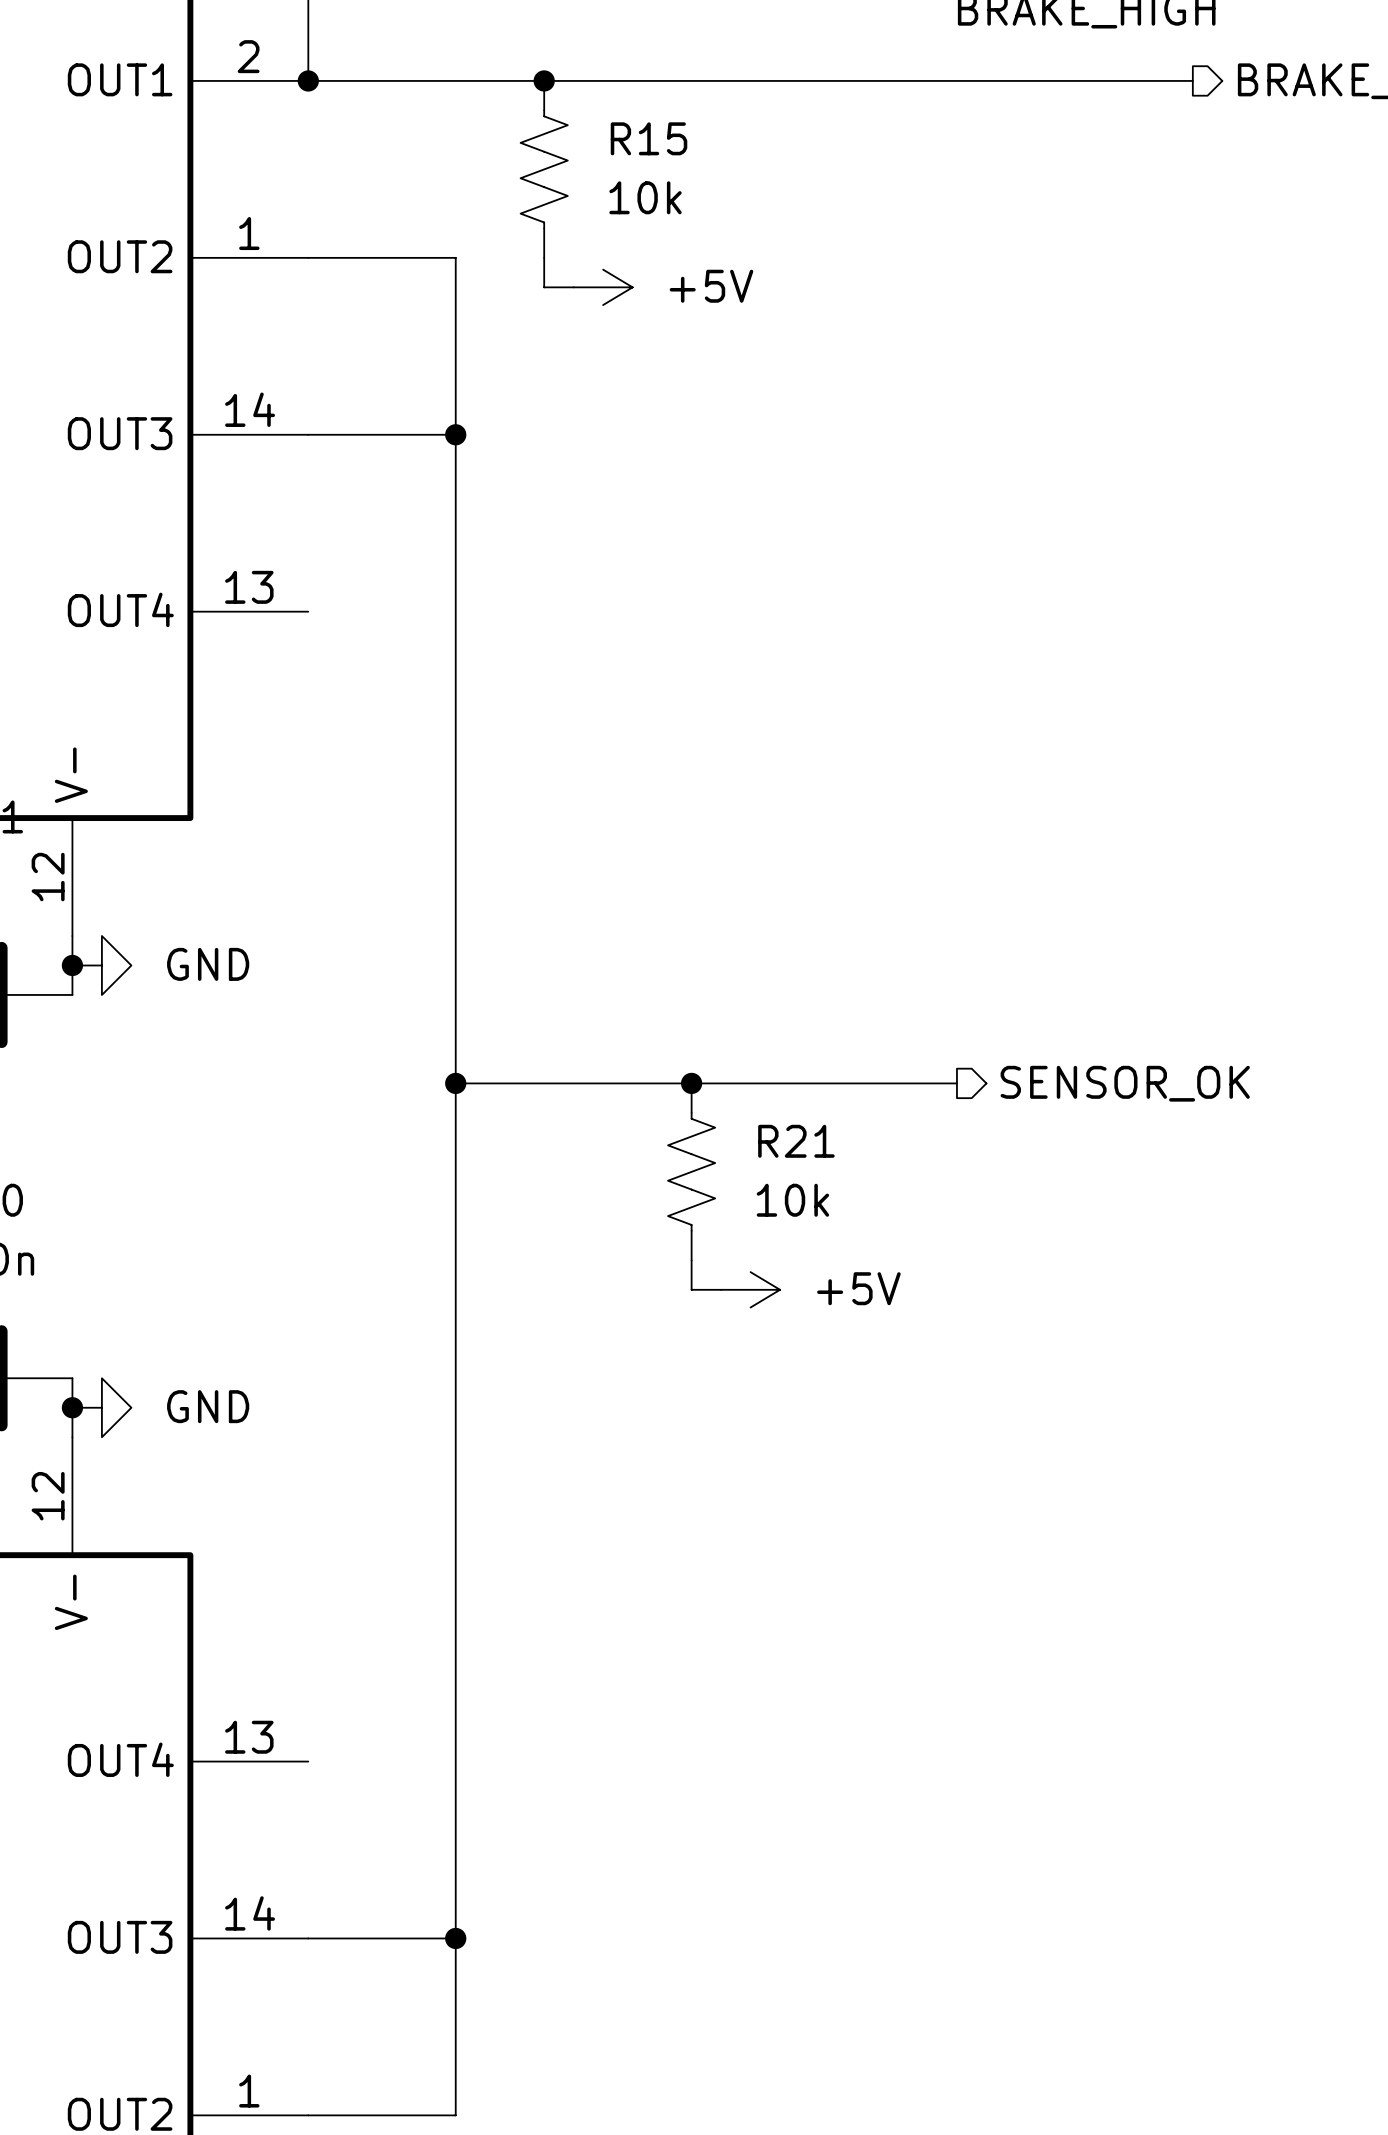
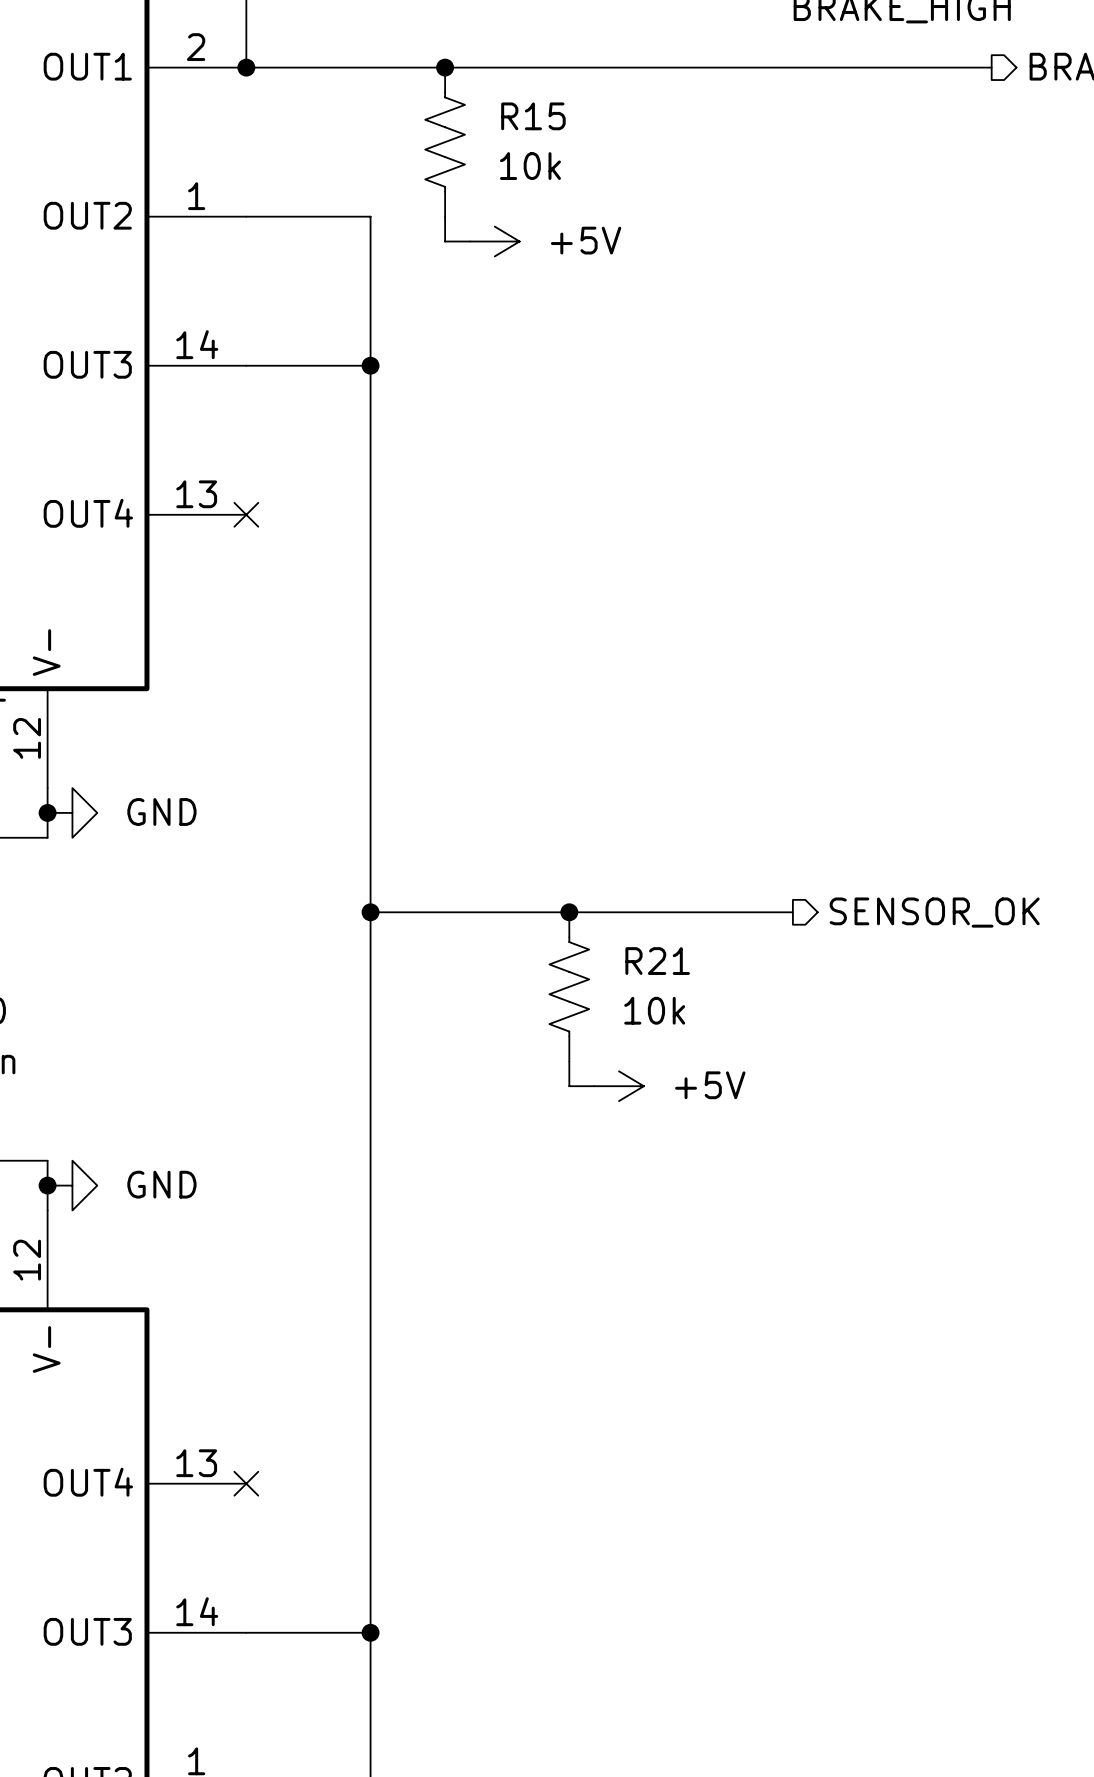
no-connect mark: none -> (246, 514)
no-connect mark: none -> (246, 1483)

